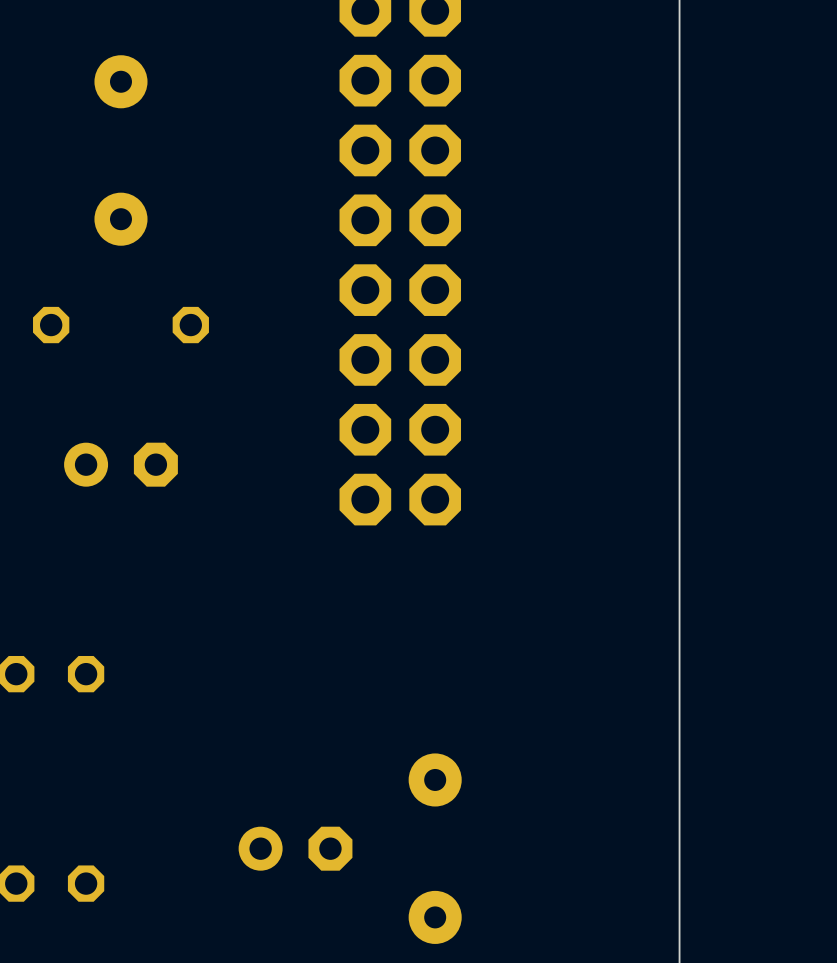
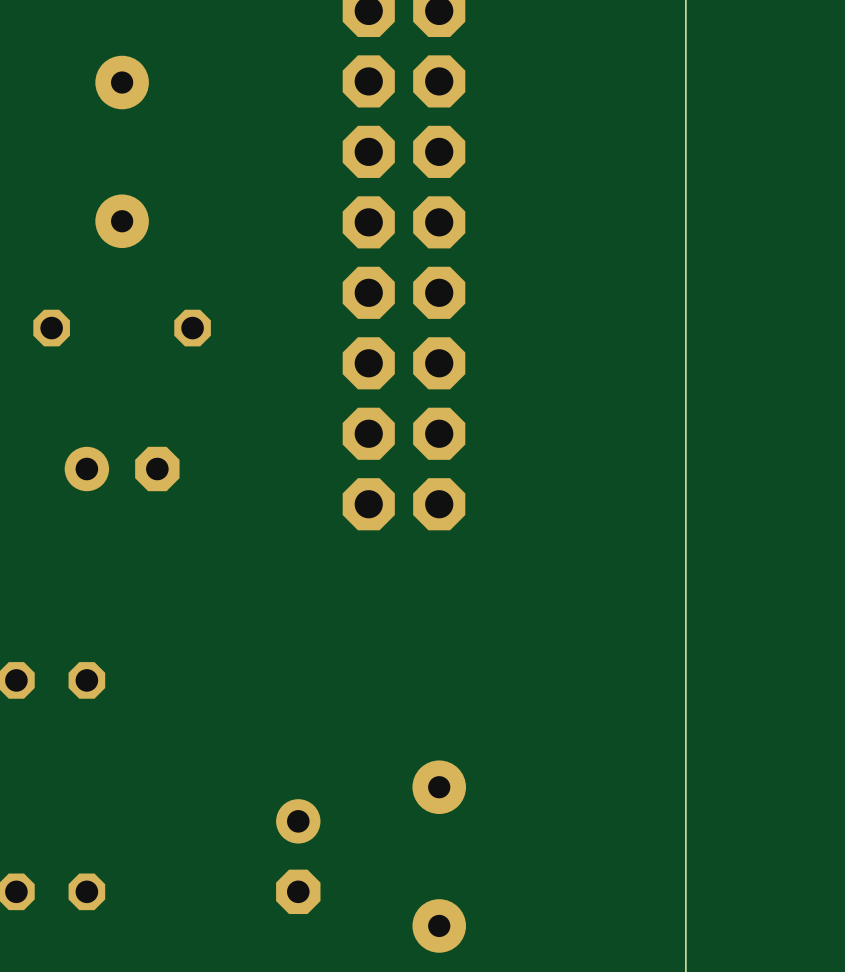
part rotation: 0° (295, 848) -> 90° clockwise (298, 856)

